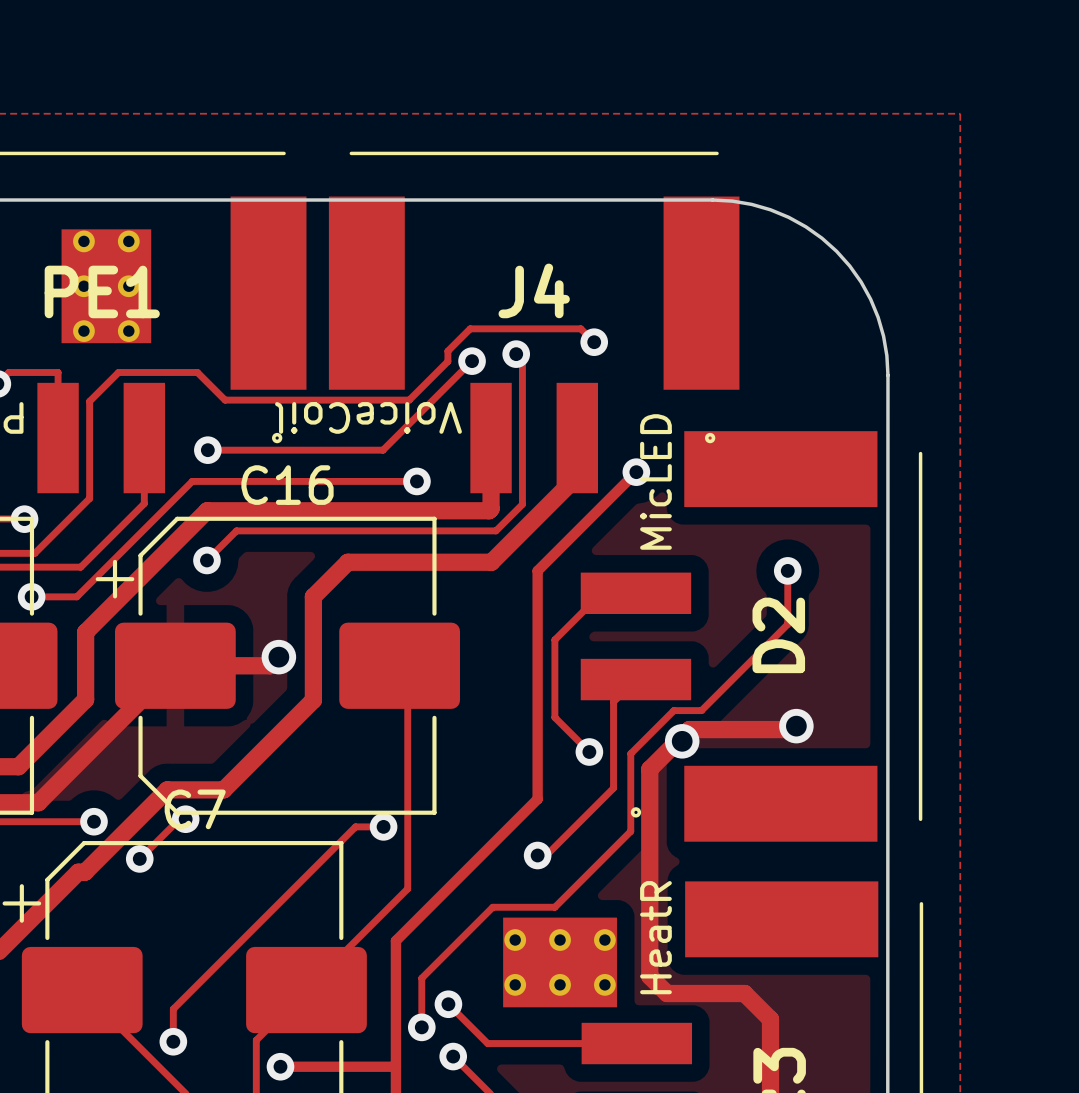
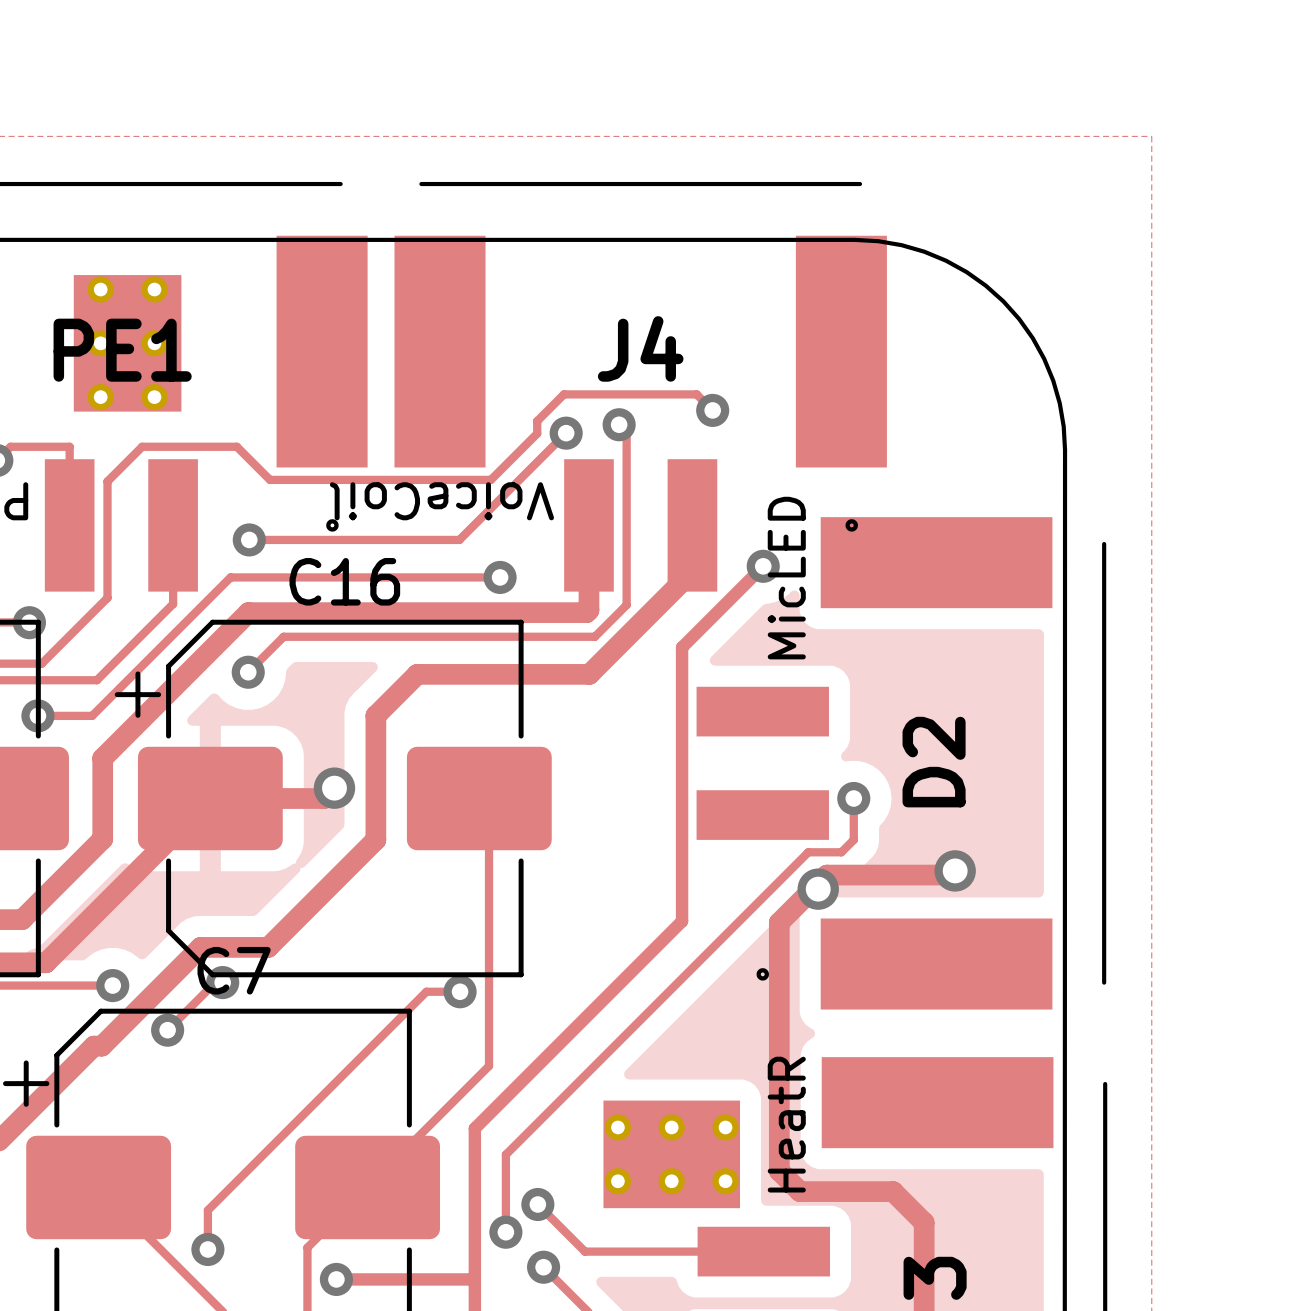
track: (568, 539) (537, 570) (537, 799) -> (682, 647) (682, 921) (644, 958)
track: (787, 570) (787, 624) (711, 700) -> (853, 798) (853, 839)
via: (787, 570) -> none
track: (635, 593) (601, 593) (554, 639) (554, 717) (589, 752) -> none
via: none -> (853, 798)
track: (635, 679) (613, 701) (613, 788) (546, 855) (537, 855) -> none
via: (589, 752) -> none
track: (630, 753) (630, 831) (554, 907) (492, 907) (421, 978) -> (756, 903) (505, 1154) (505, 1173)
via: (537, 855) -> none

